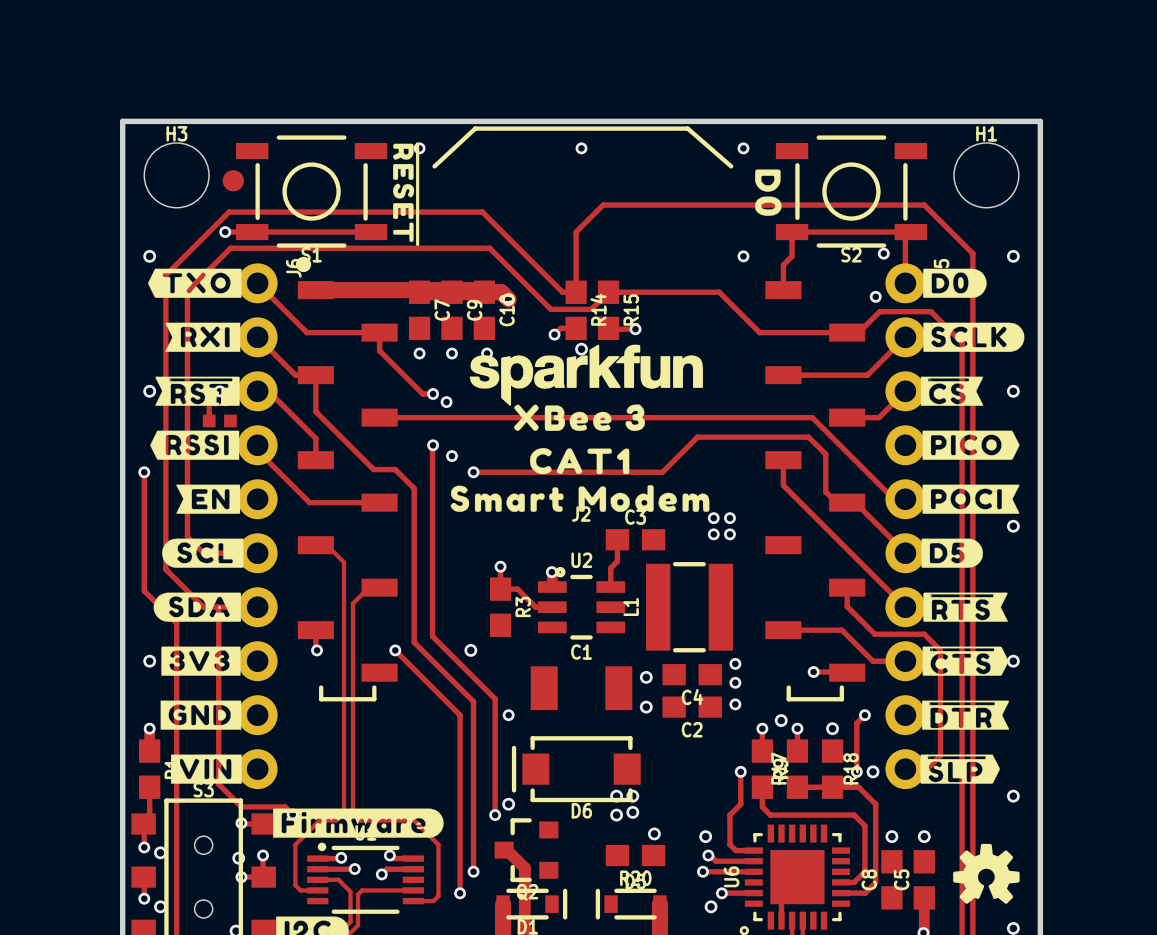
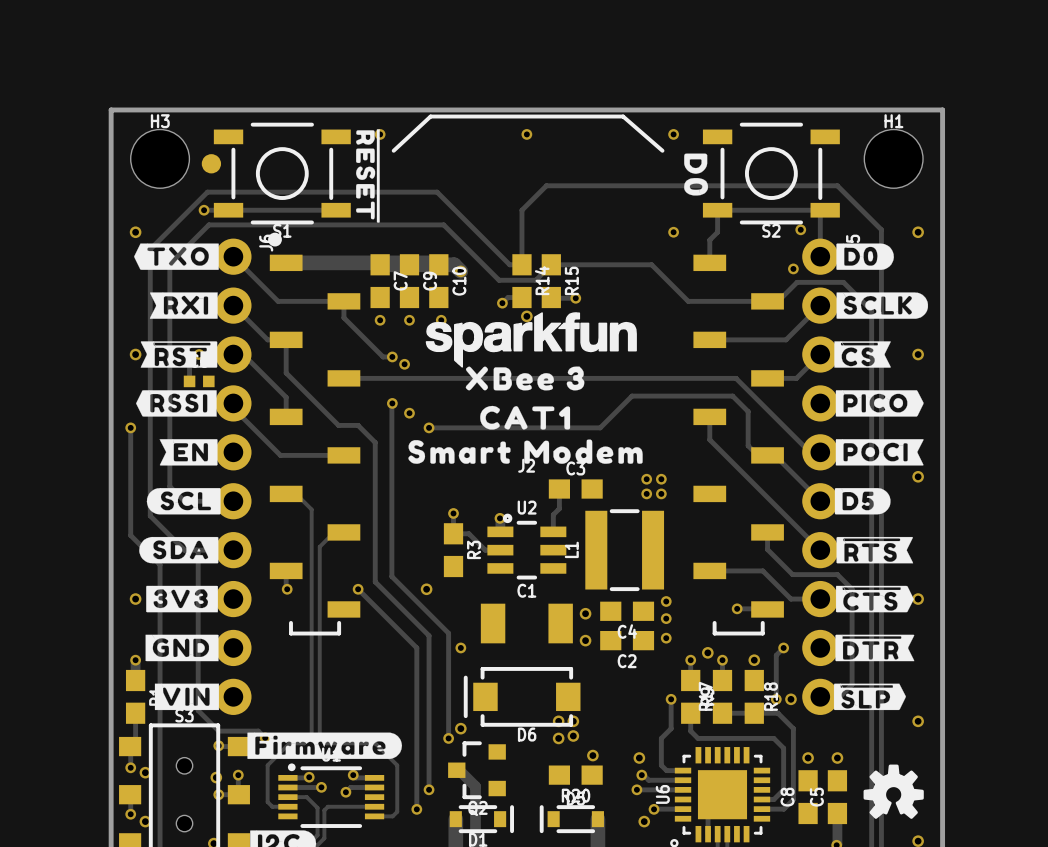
via: (713, 518) -> none
via: (729, 518) -> none
via: none -> (646, 479)
via: none -> (661, 479)
via: (713, 534) -> none
via: (729, 534) -> none
via: none -> (646, 493)
via: none -> (661, 493)

